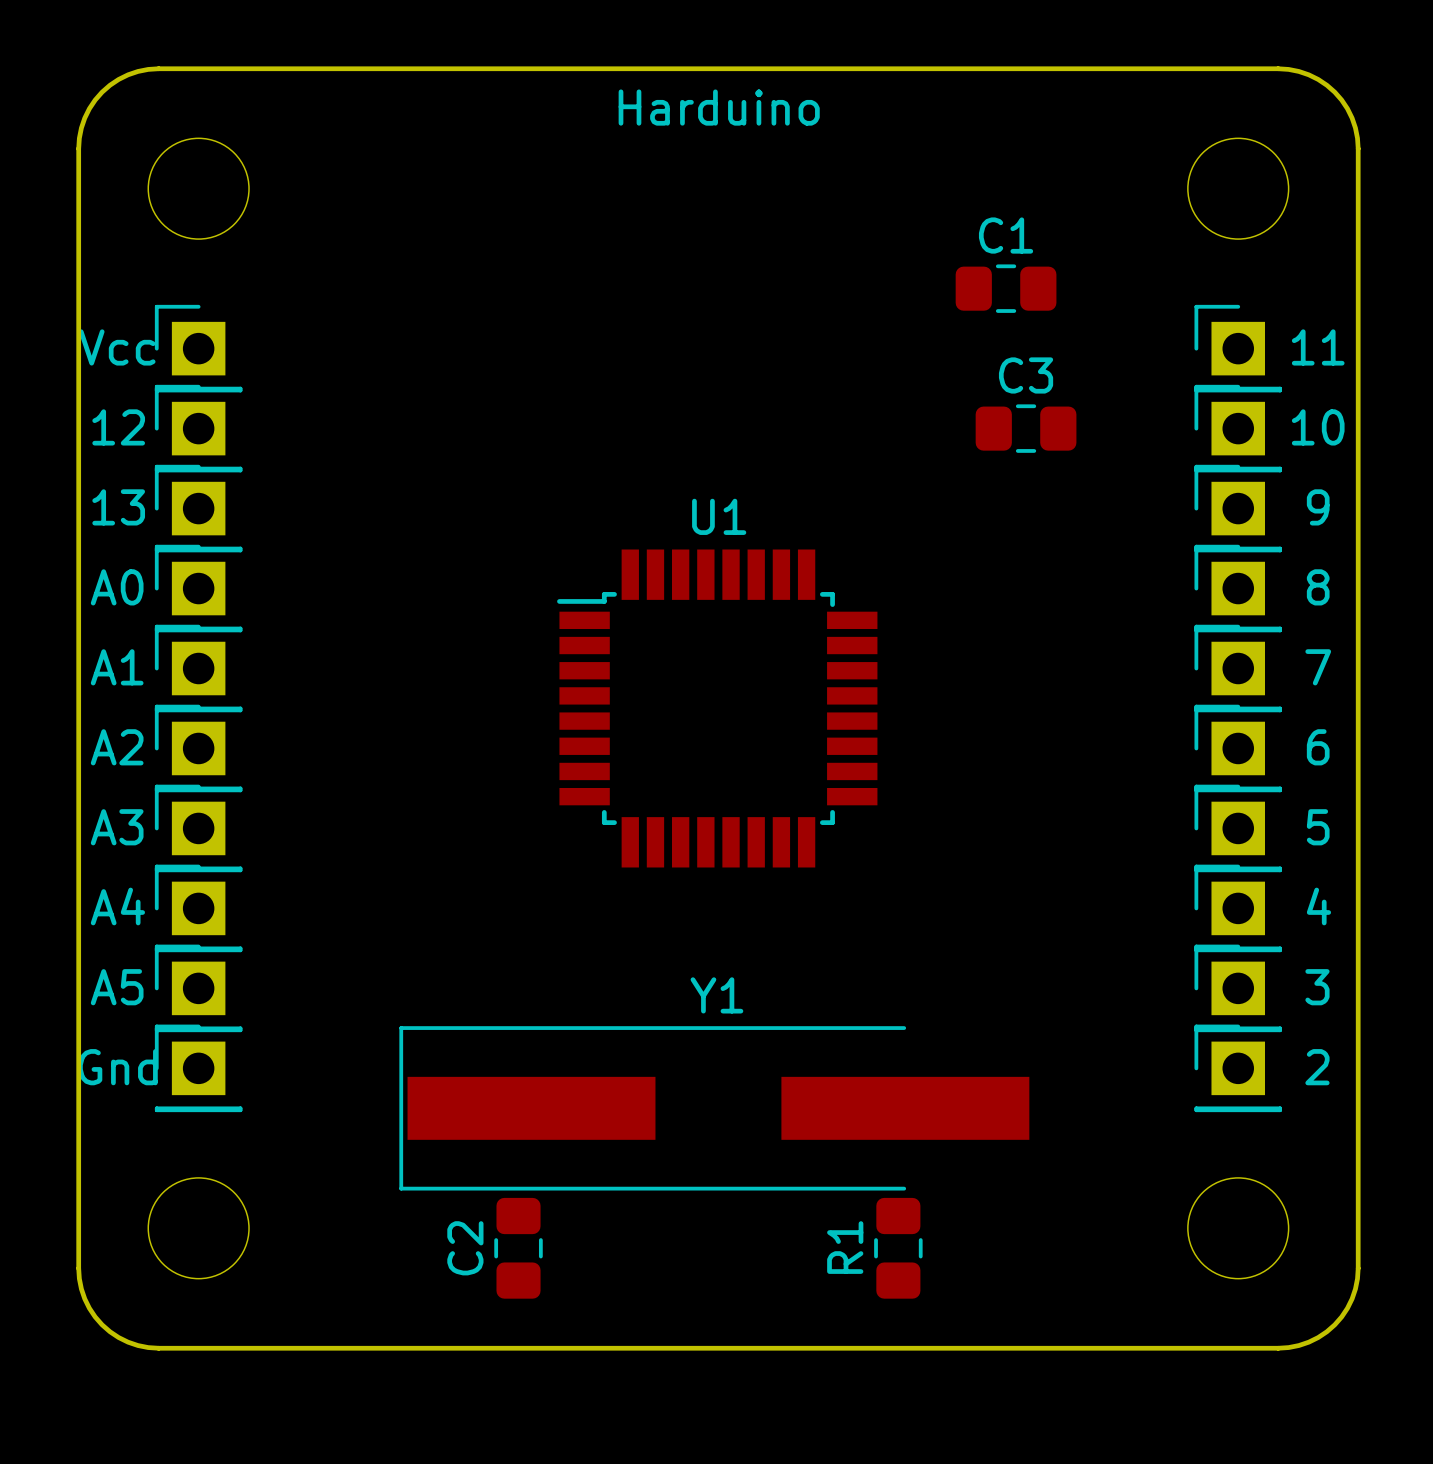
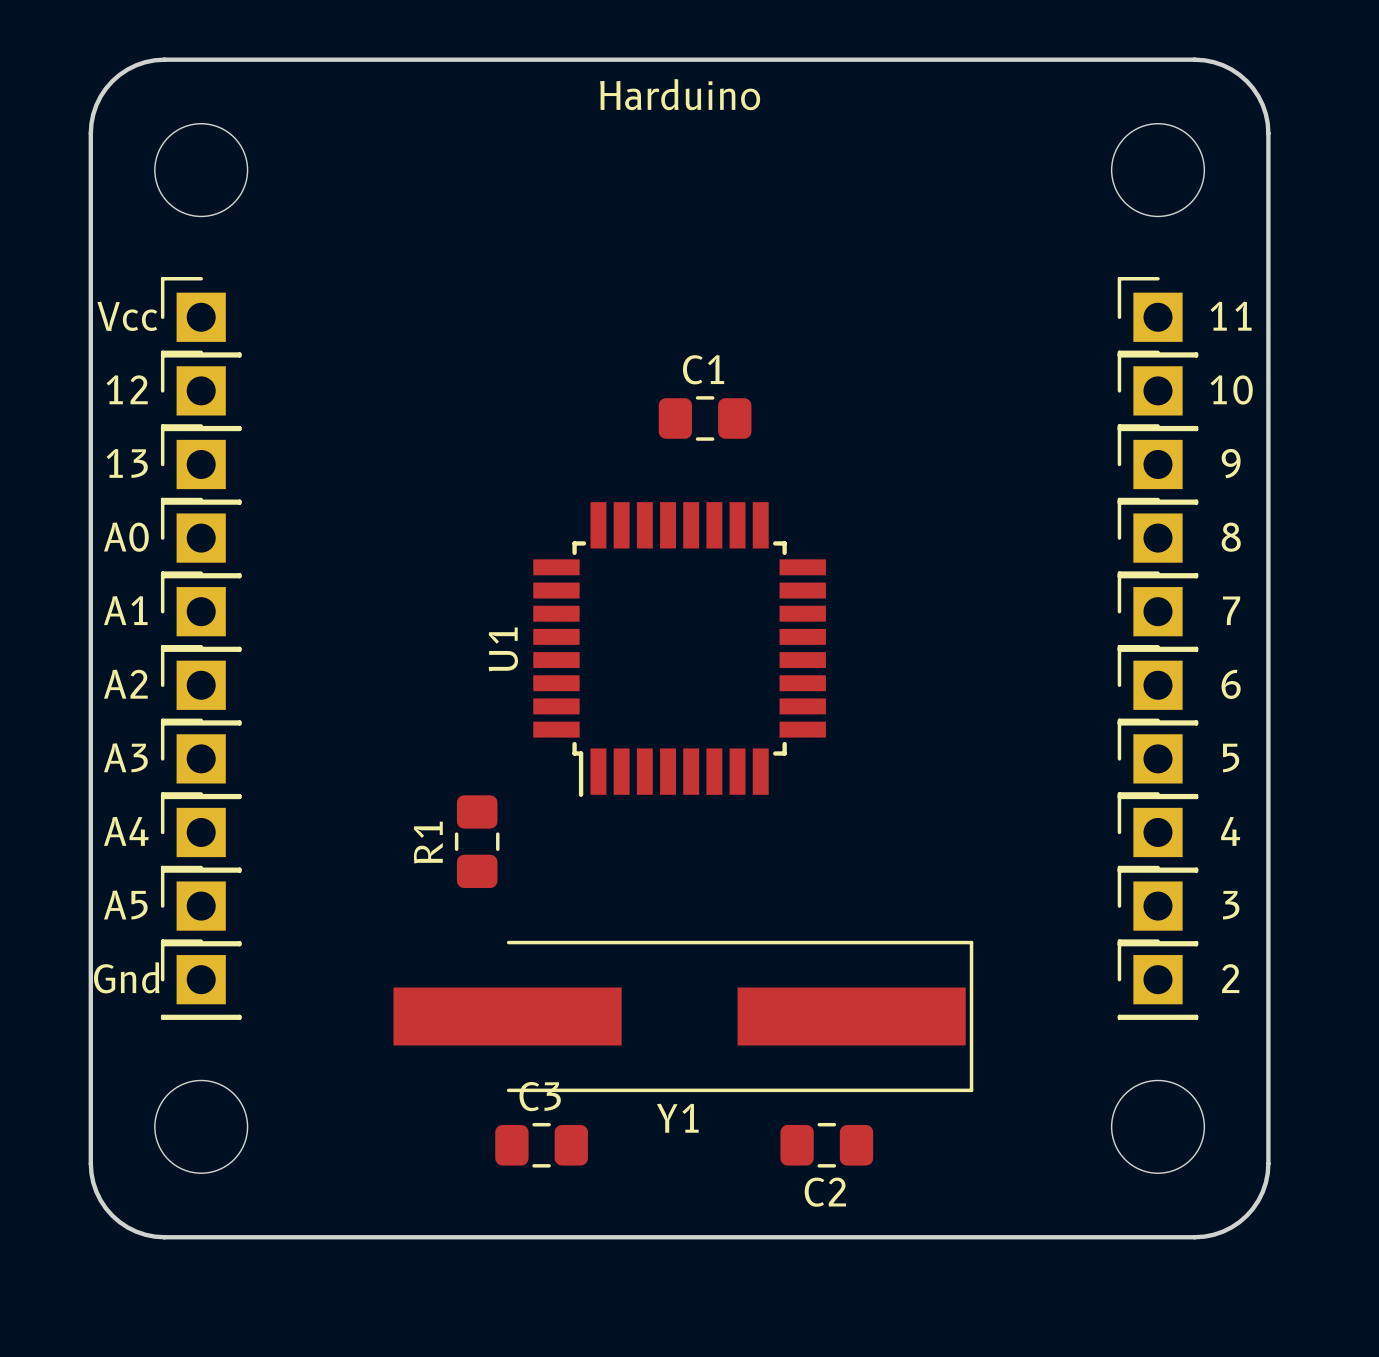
C1 position: (1006, 288) -> (705, 418)
C3 position: (1026, 428) -> (541, 1145)
U1 rotation: 0° (717, 708) -> 90° counterclockwise (679, 649)
Y1 rotation: 0° (714, 1108) -> 180° (683, 1016)
C2 name position: C2 (465, 1248) -> C2 (825, 1192)
C2 rotation: 0° (518, 1248) -> 90° clockwise (826, 1145)
C2 position: (518, 1248) -> (826, 1145)
R1 position: (898, 1248) -> (477, 841)

